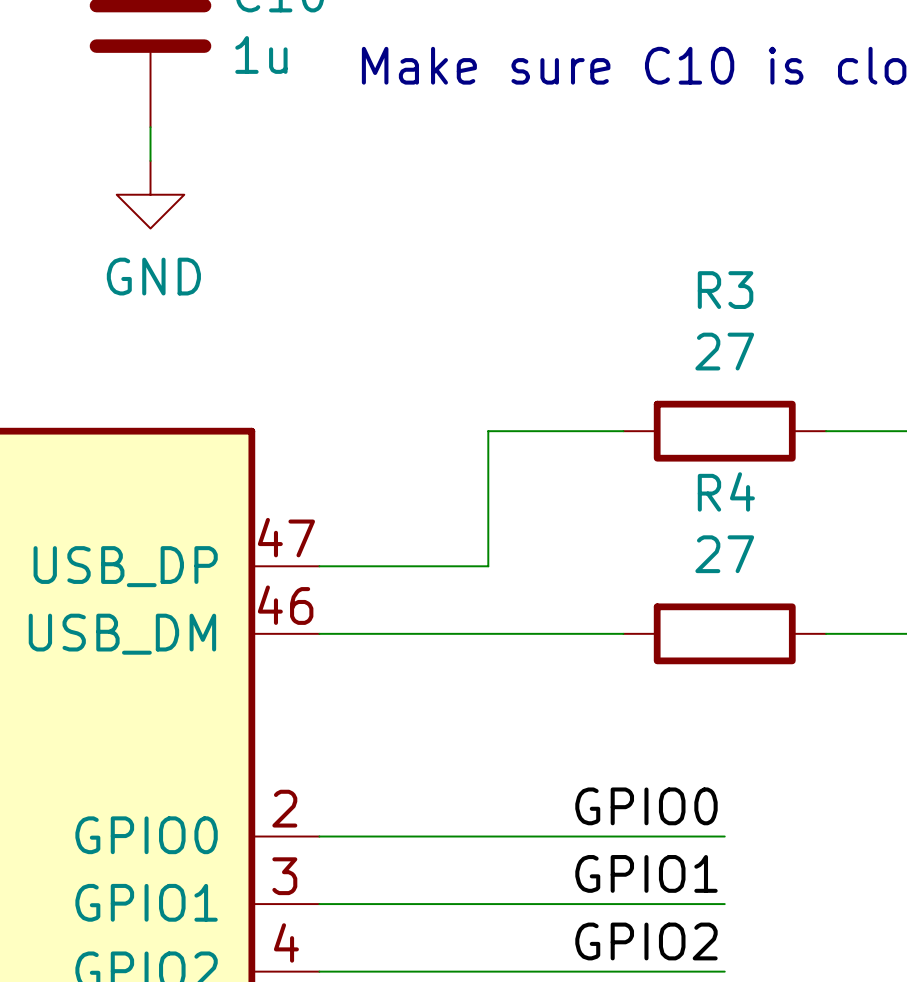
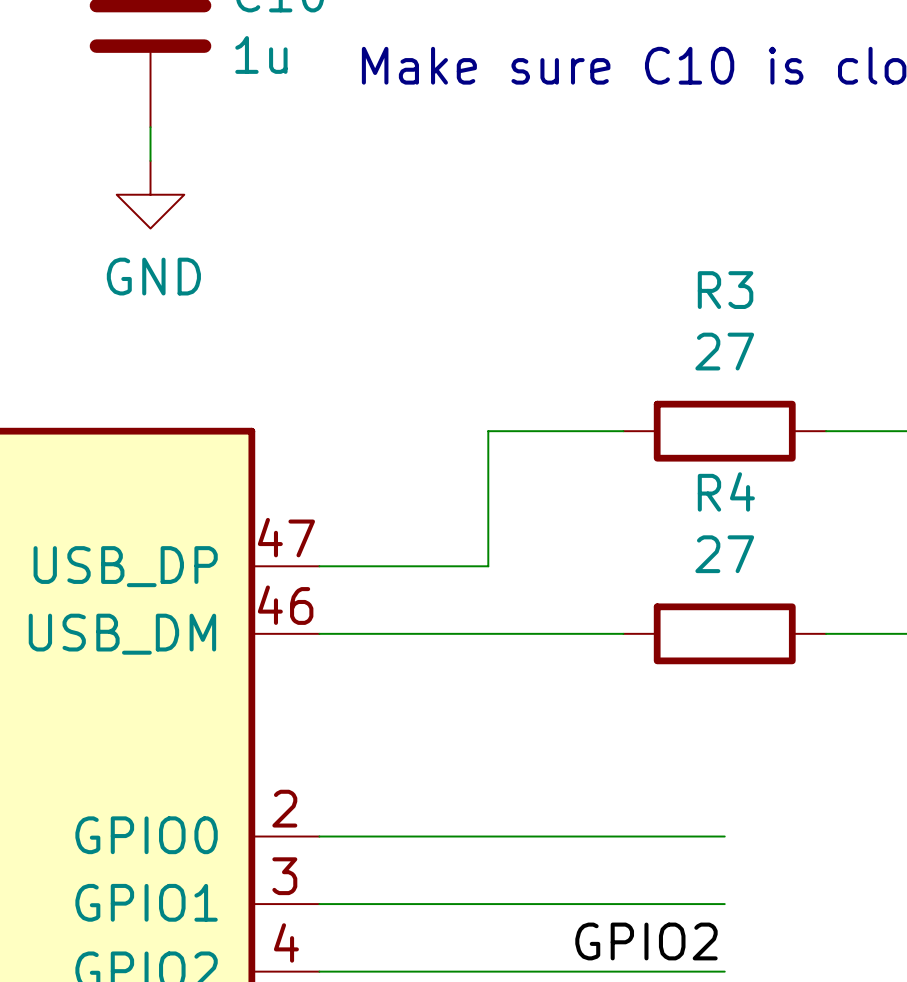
label: GPIO0 (646, 806) -> none
label: GPIO1 (646, 873) -> none

